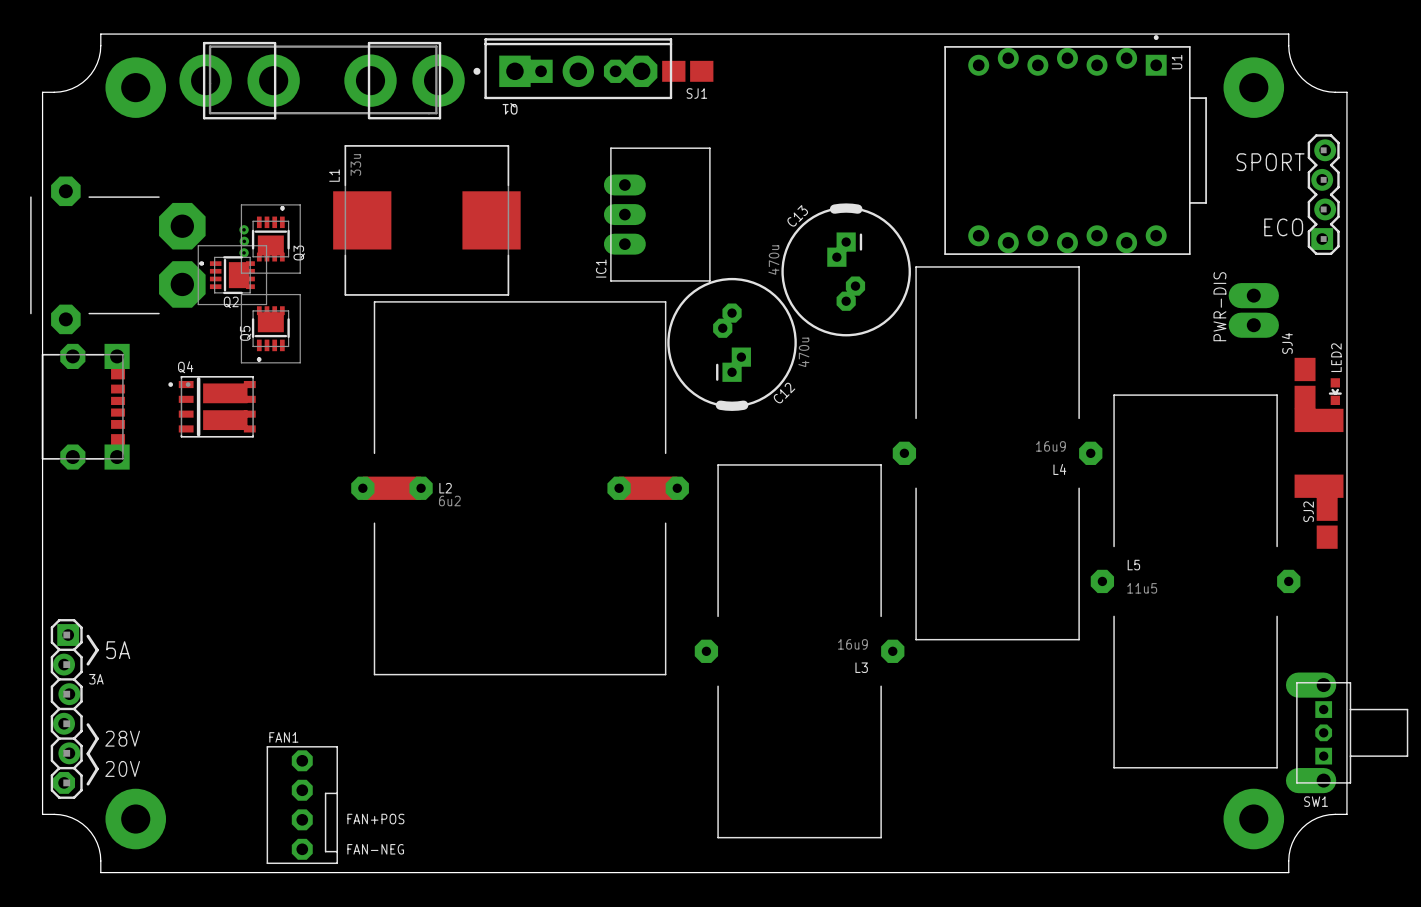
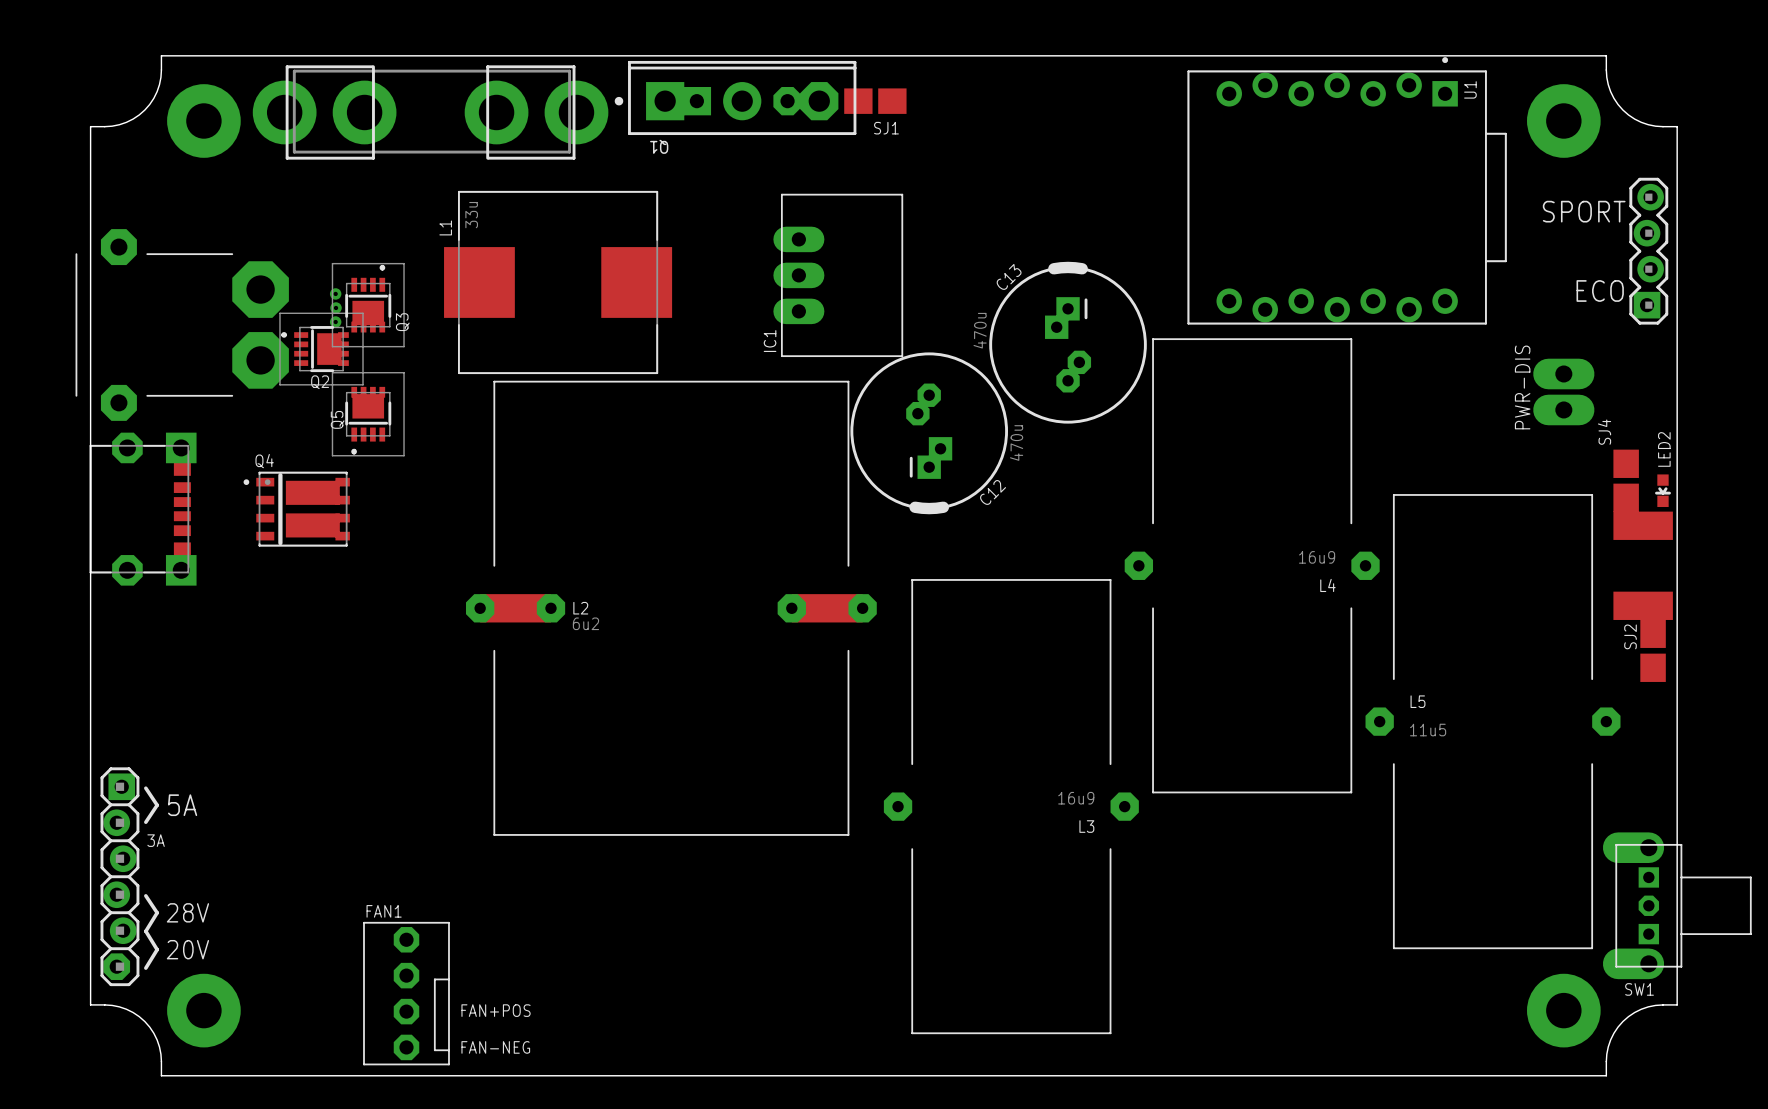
part footprint: [179, 41, 465, 120] -> [252, 65, 609, 160]

